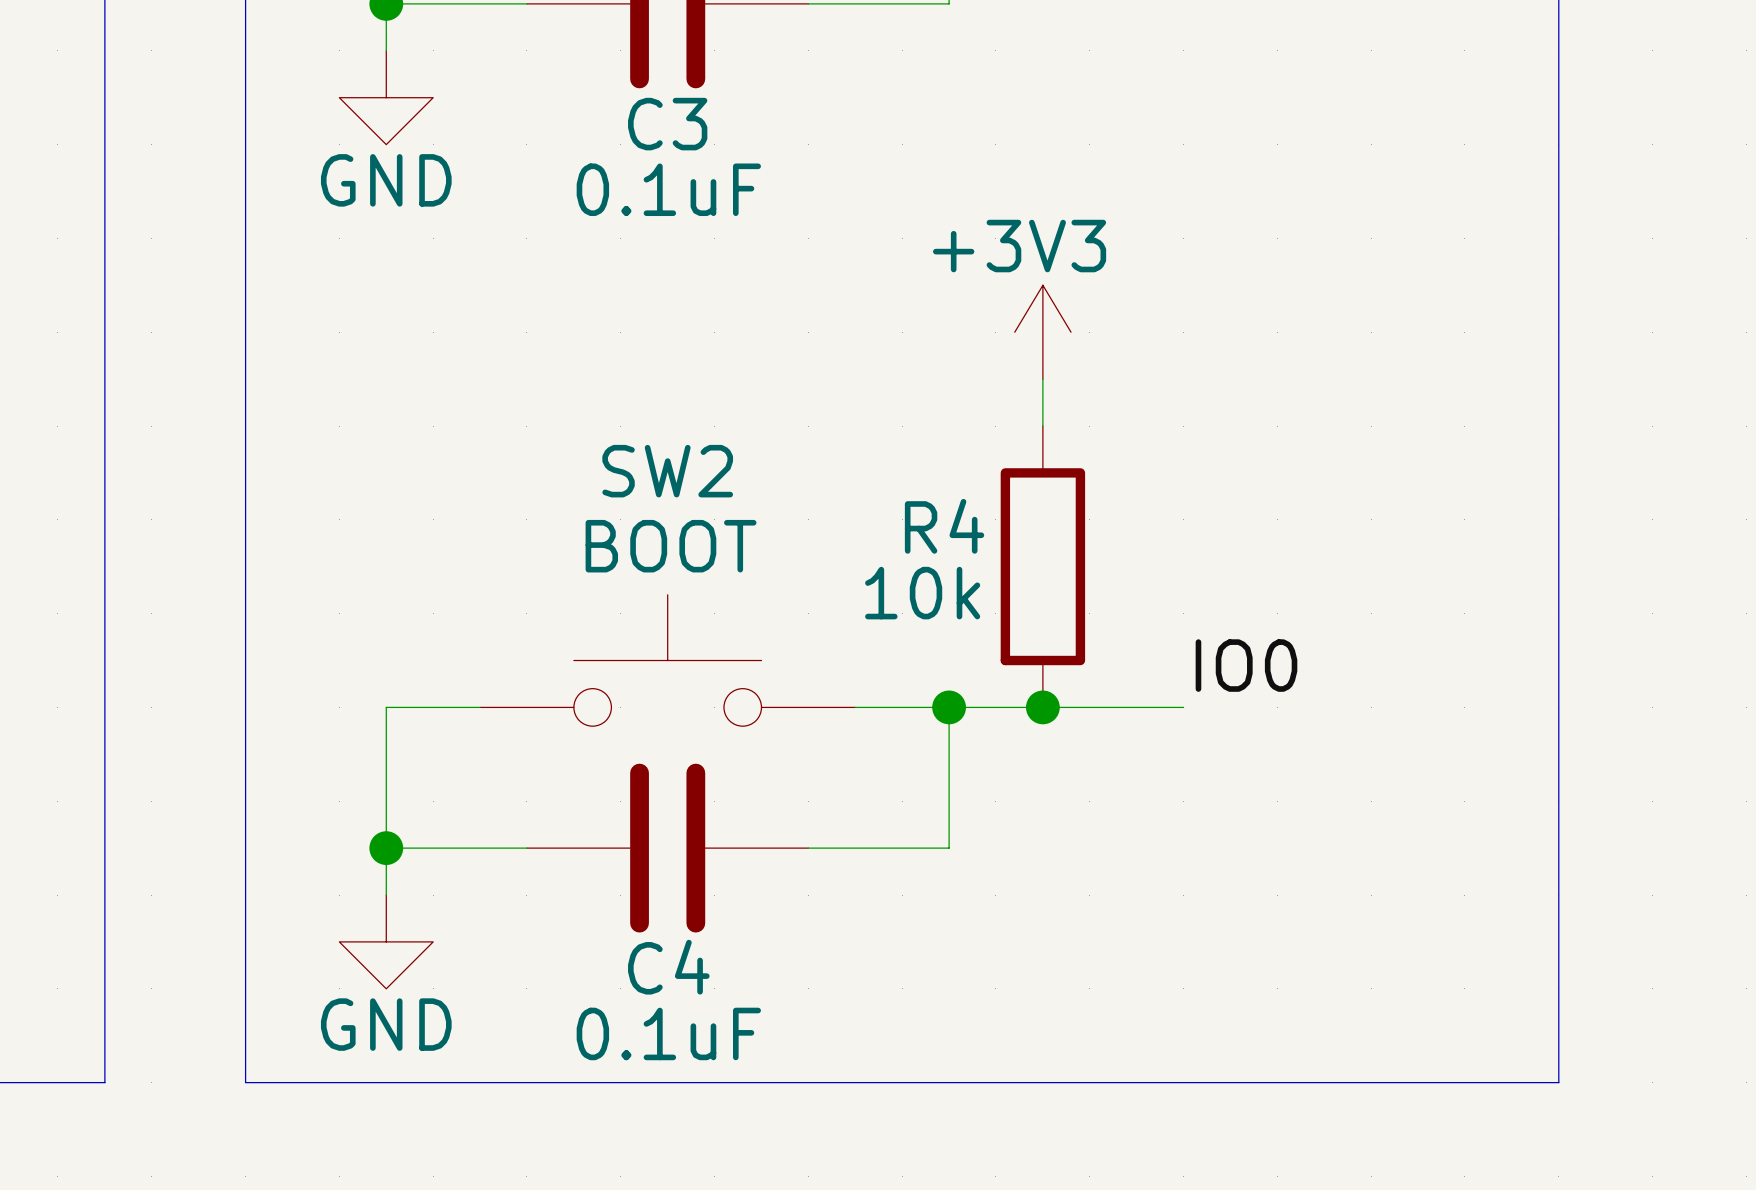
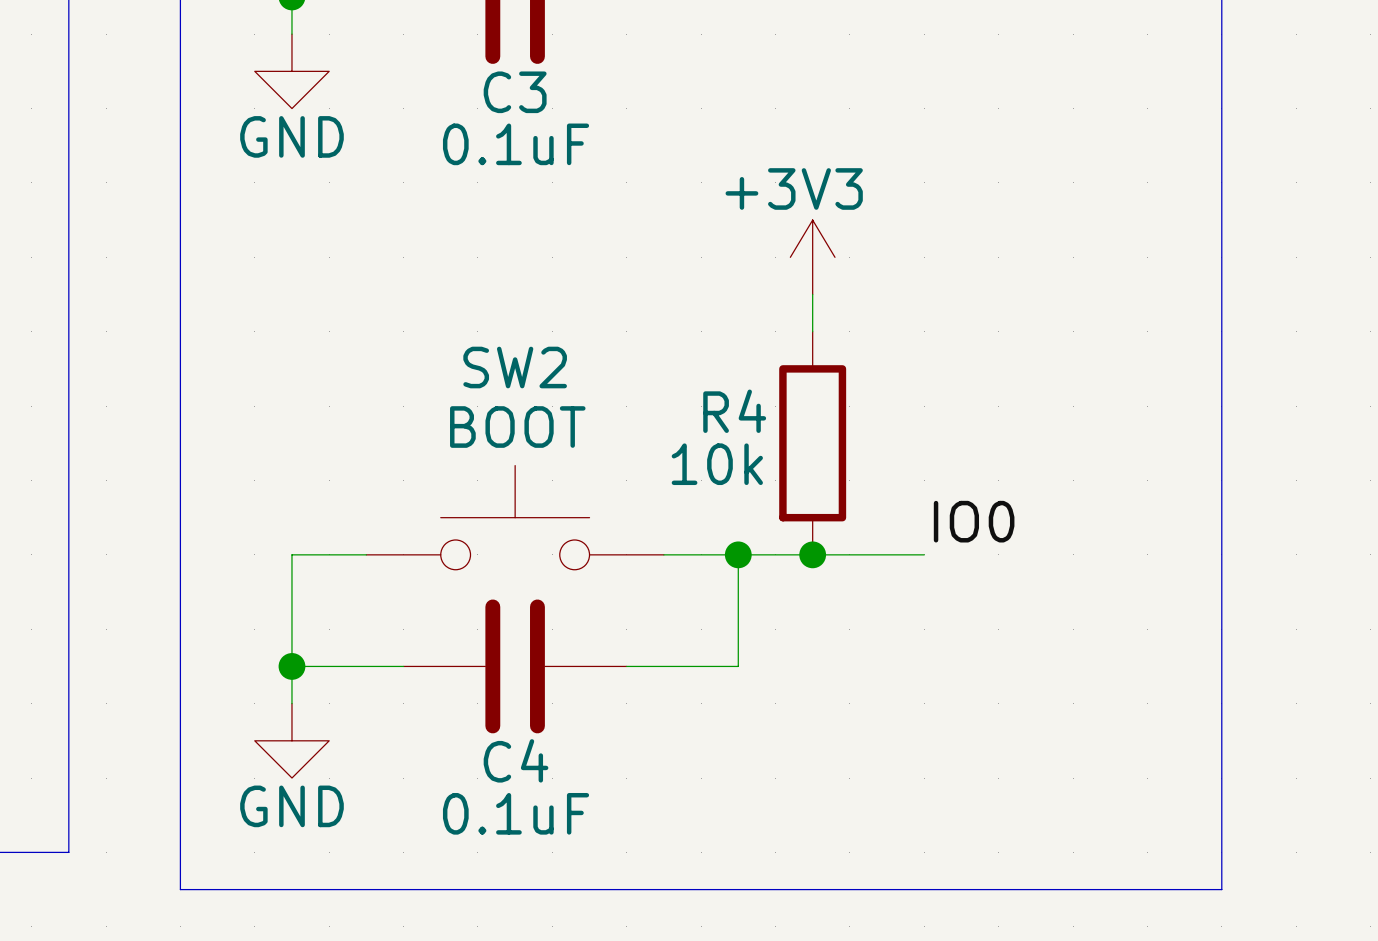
line: (245, 1082) (1558, 1082) -> (180, 852) (180, 889) (1221, 889) (1221, 852)

